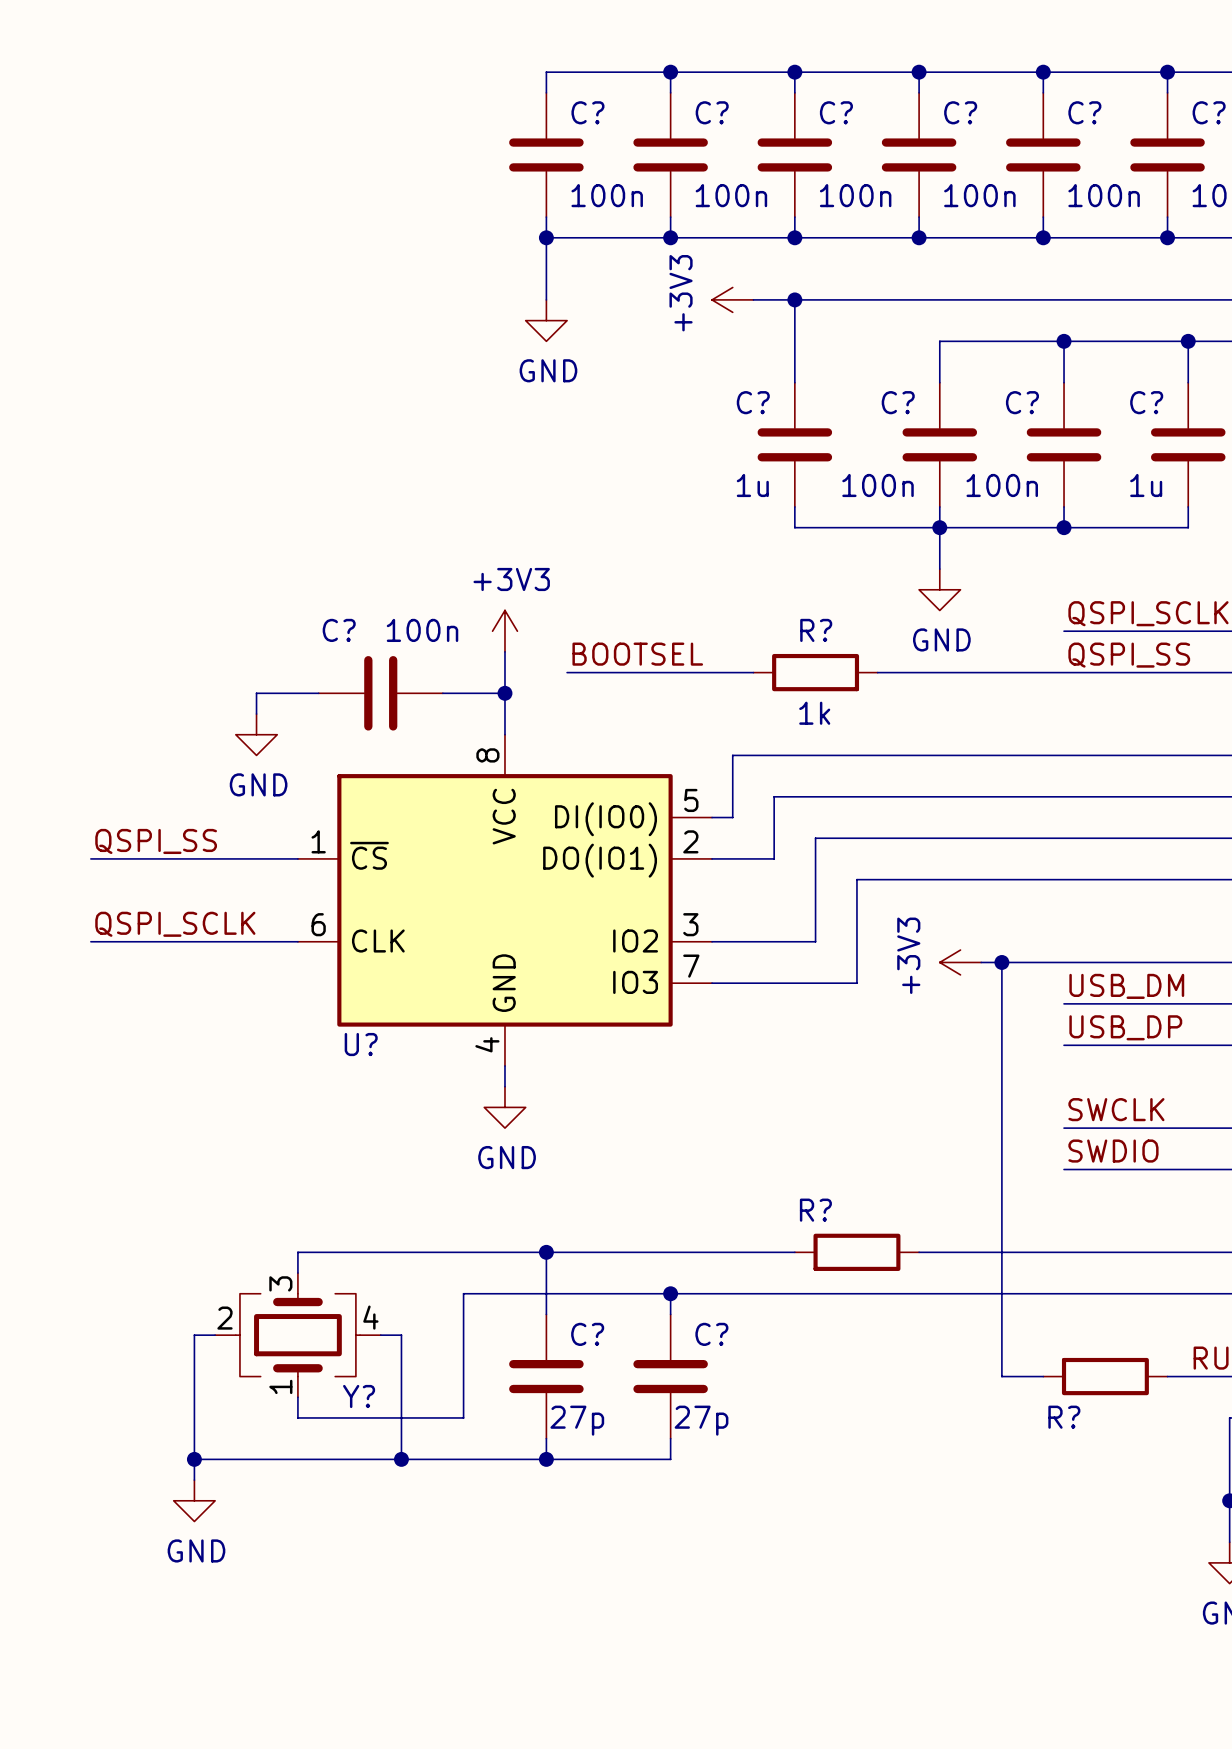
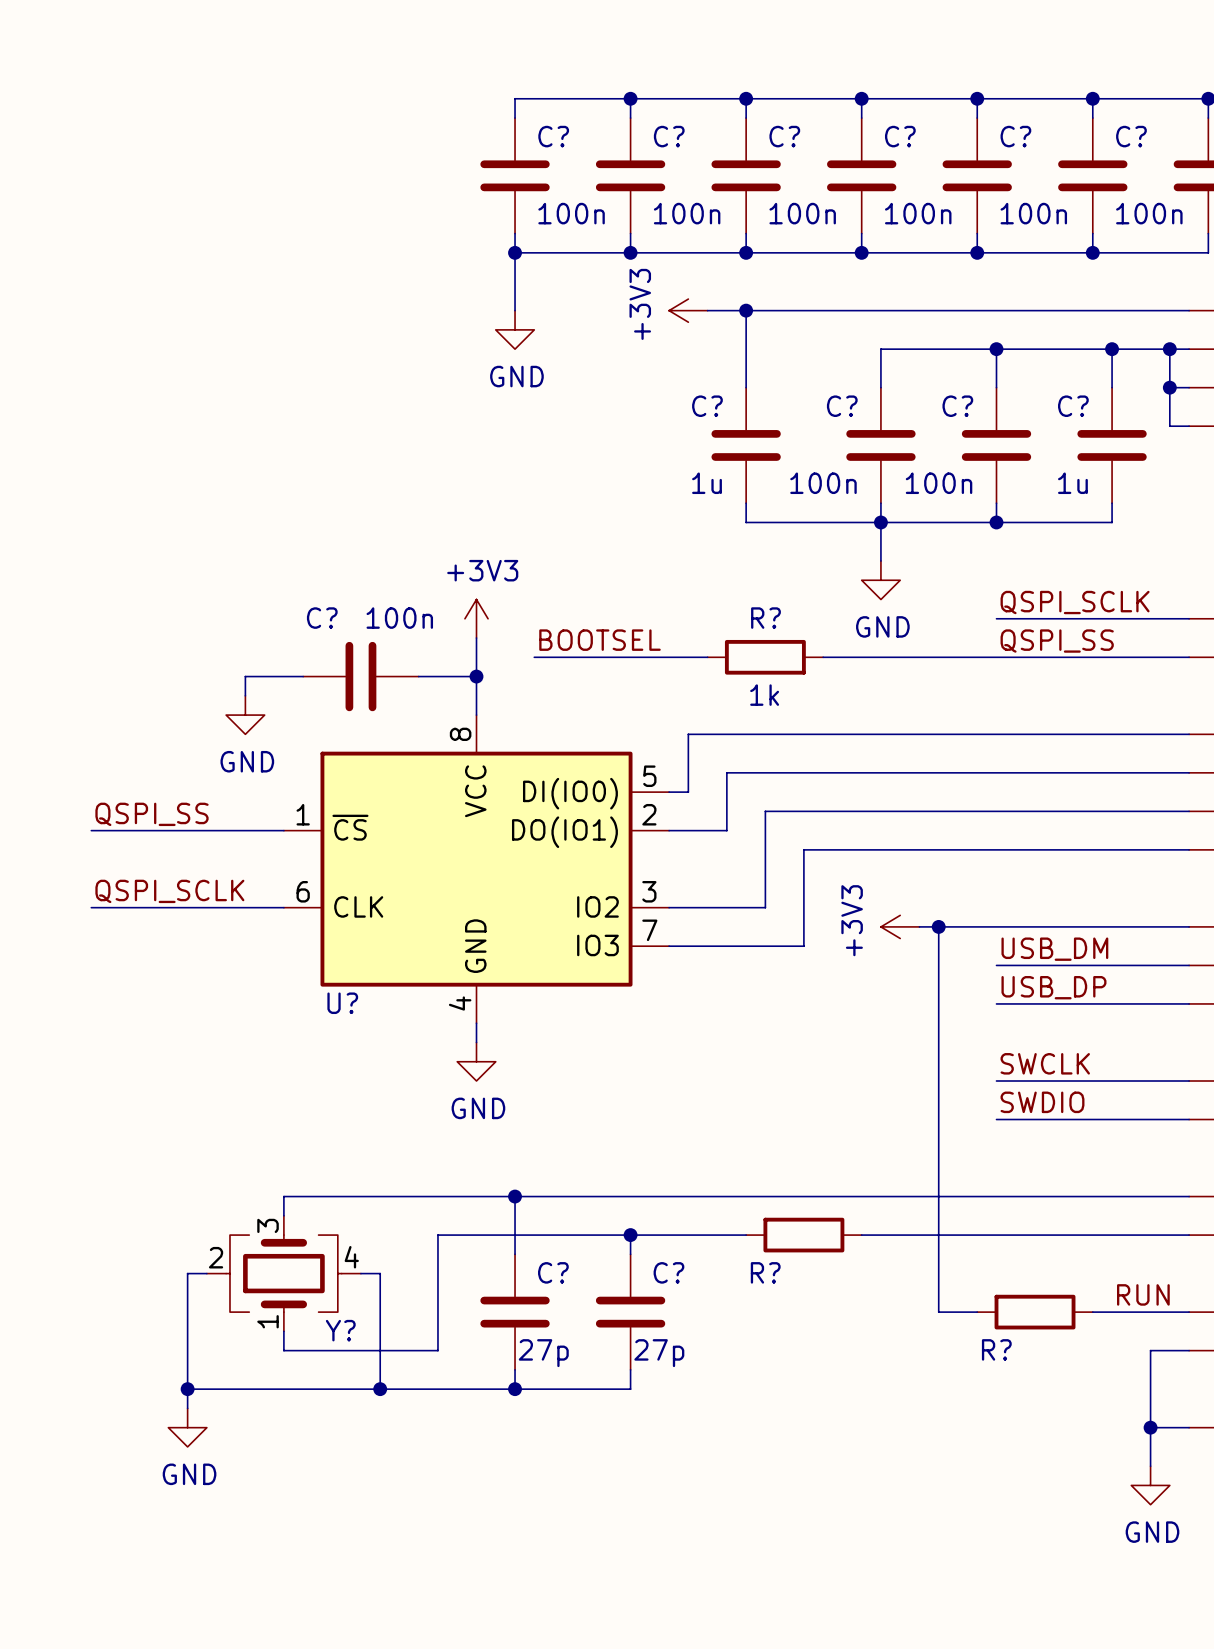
R? name position: R? (815, 1210) -> R? (765, 1272)
R? position: (856, 1252) -> (803, 1235)
wire: (794, 1293) (919, 1293) -> (746, 1196) (861, 1196)

